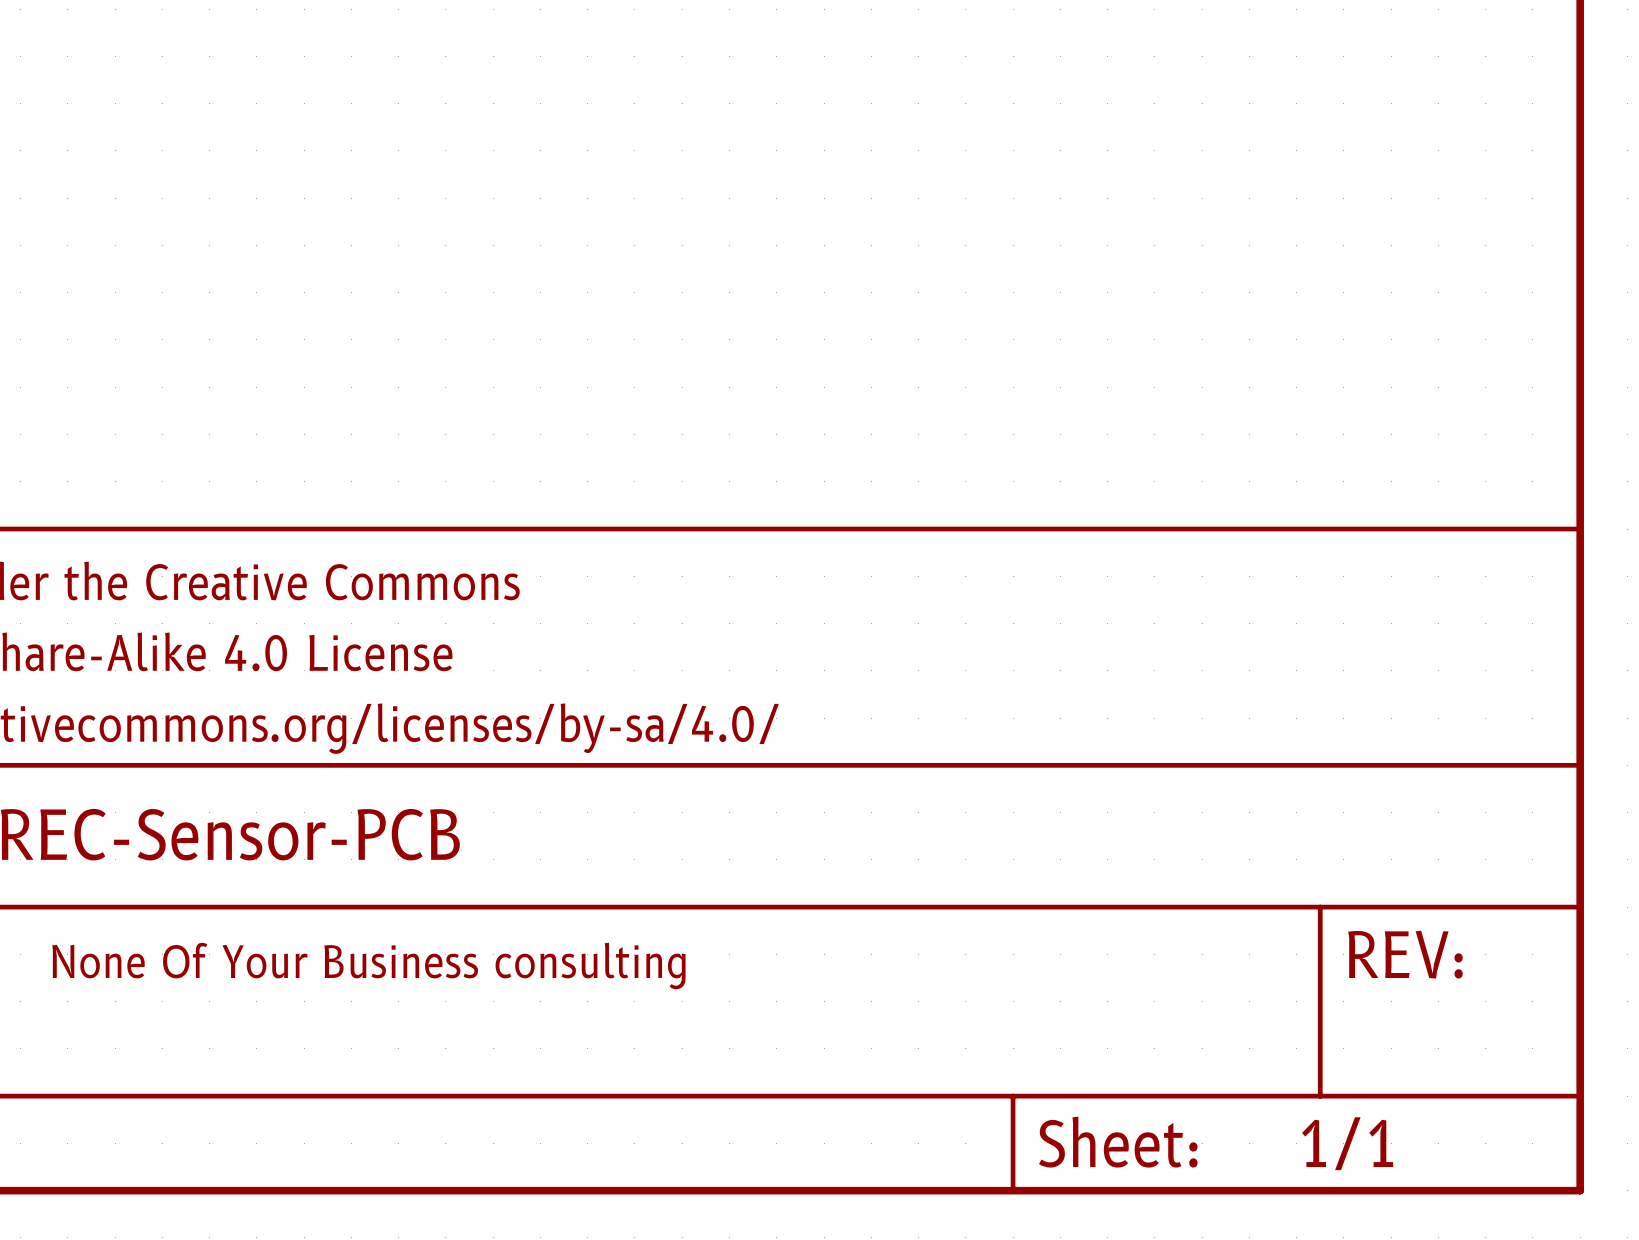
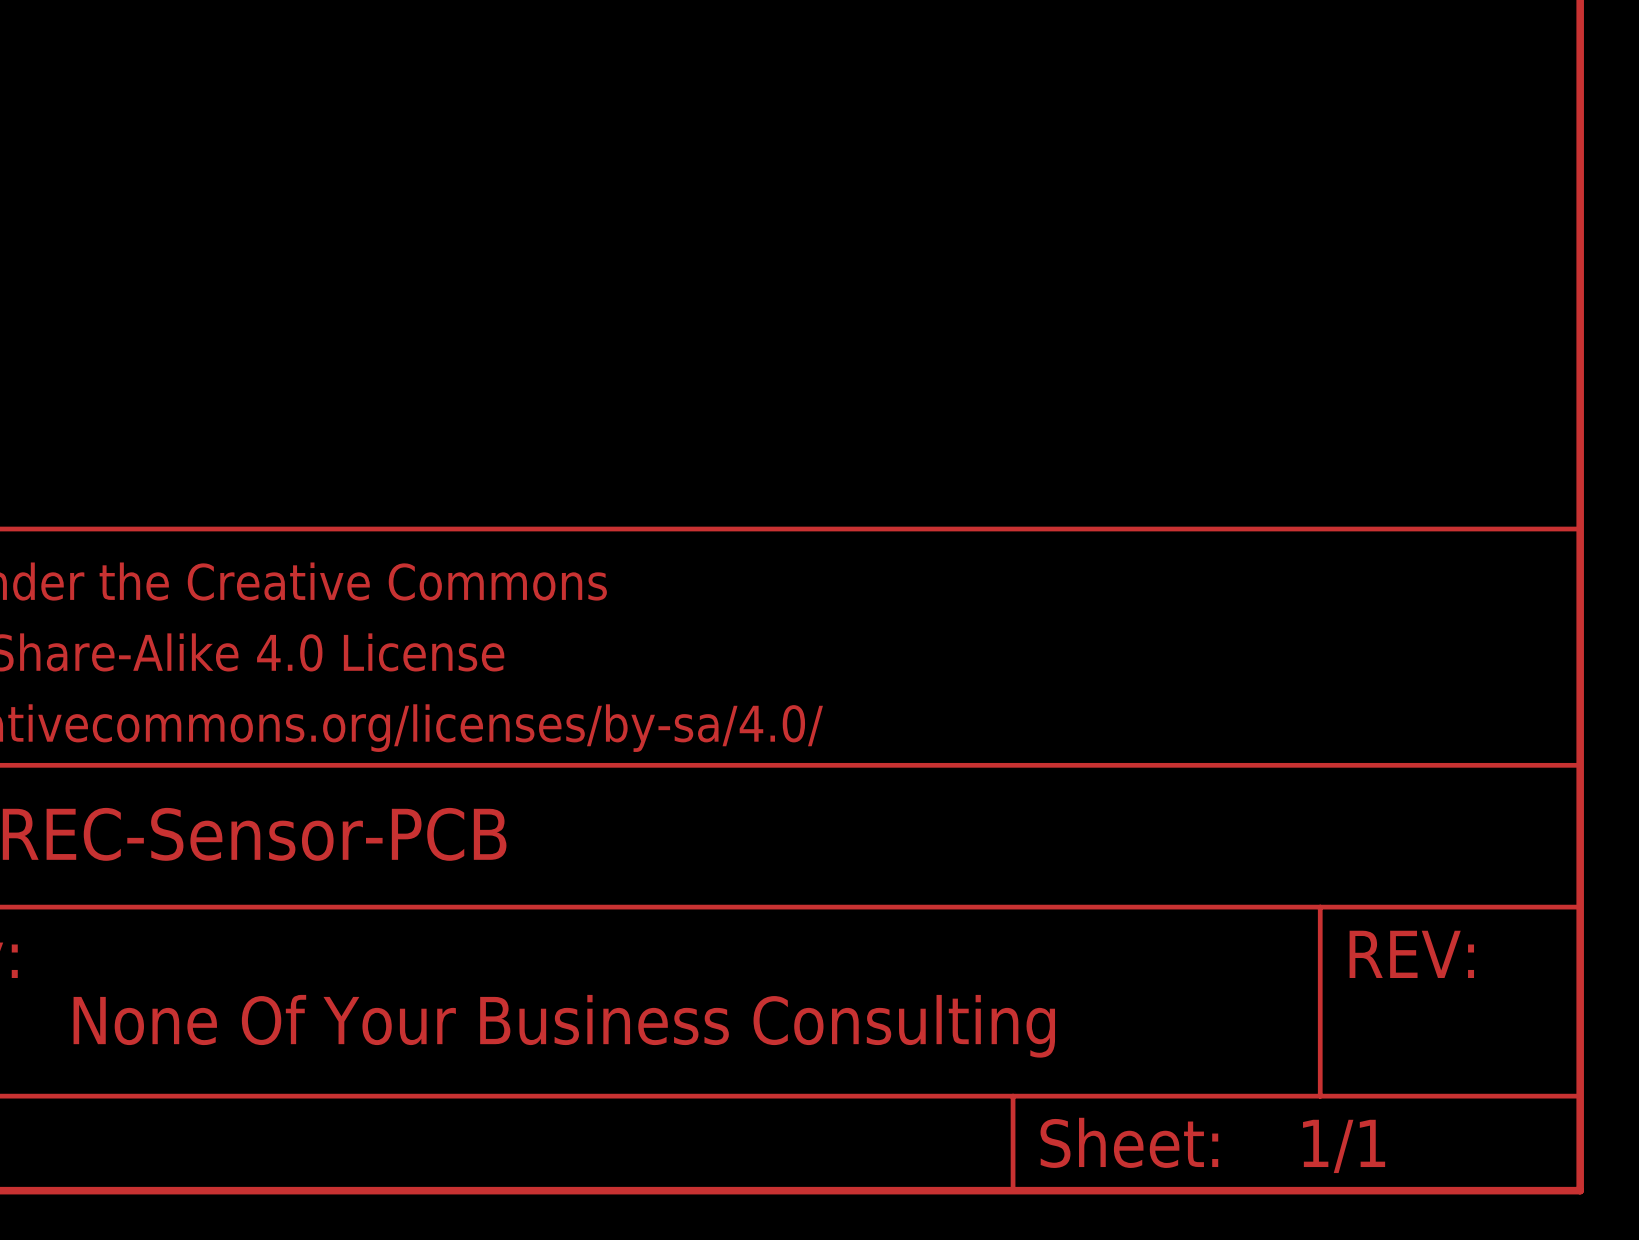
text: None Of Your Business consulting (368, 965) -> None Of Your Business Consulting (564, 1026)

